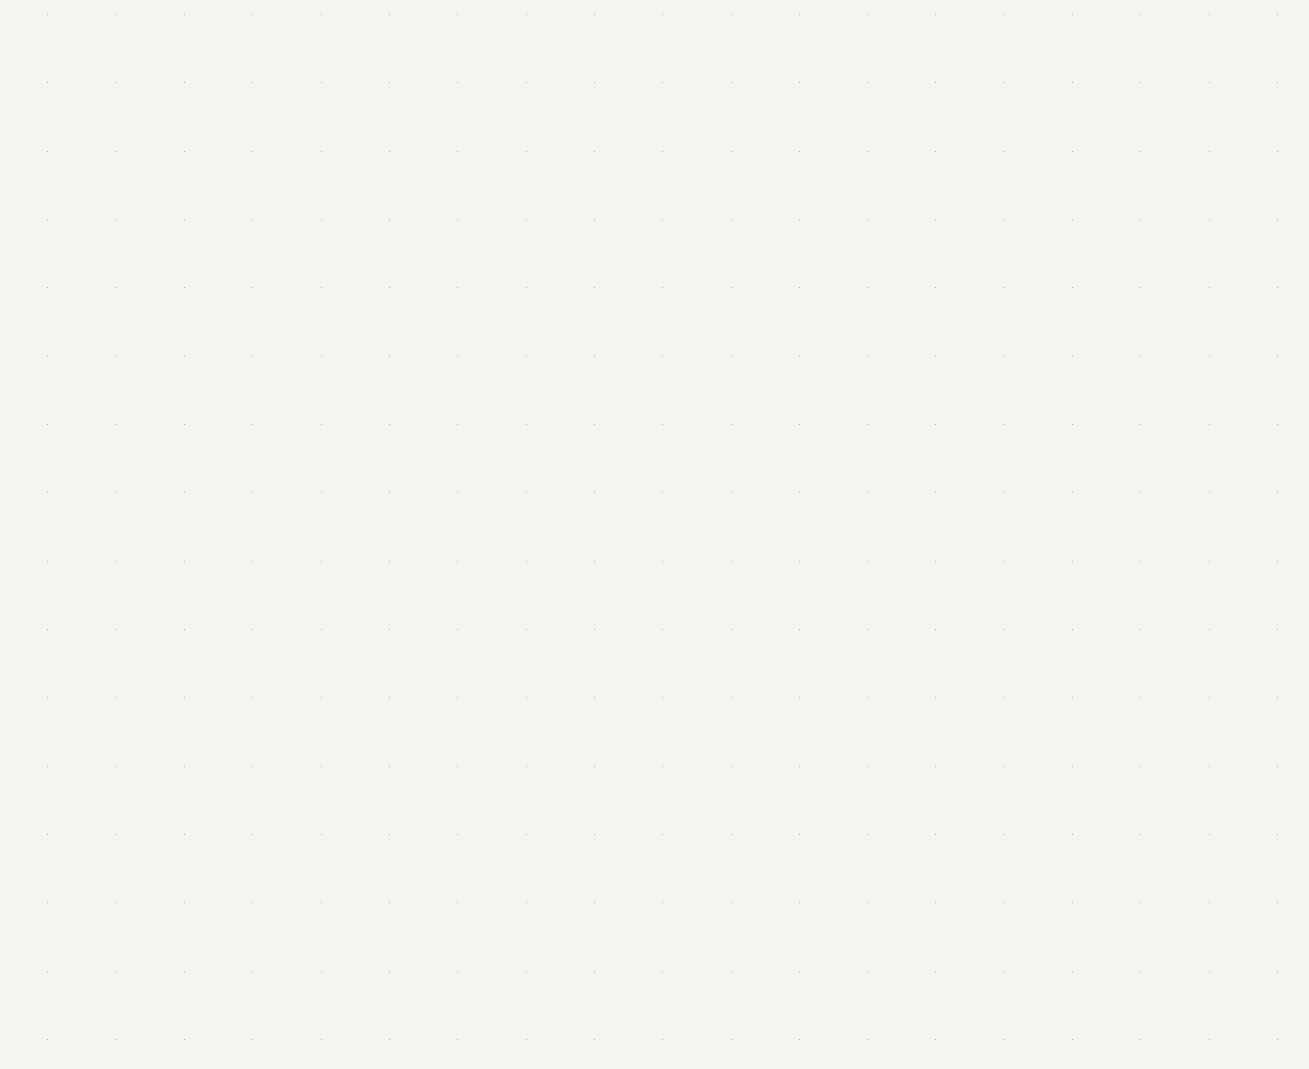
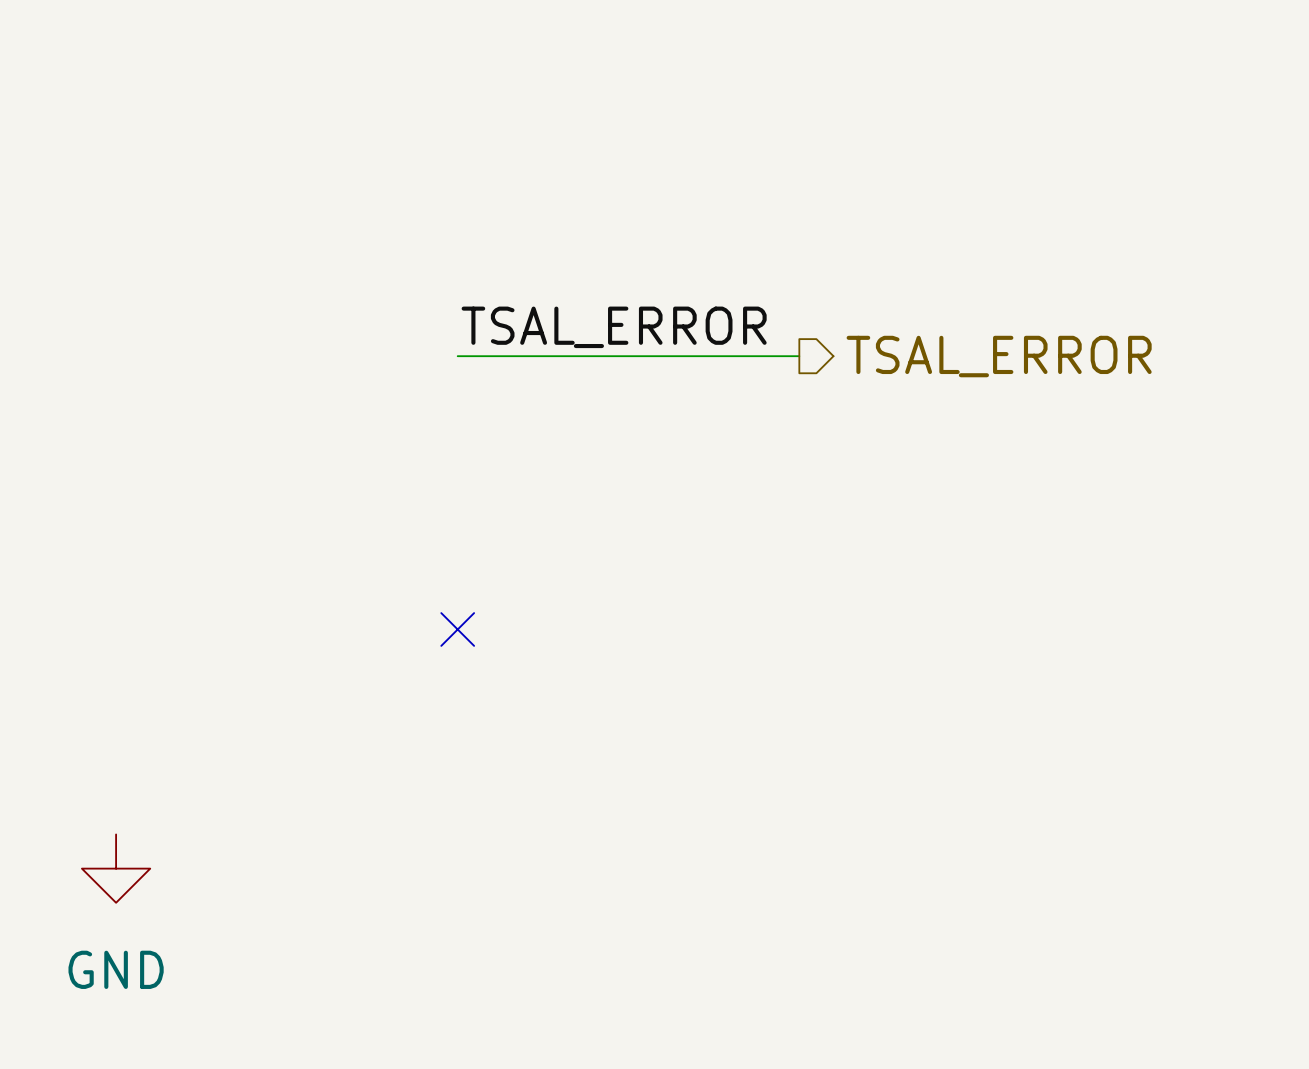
label: none -> TSAL_ERROR (614, 327)
wire: none -> (457, 356) (799, 356)
hierarchical label: none -> TSAL_ERROR (999, 356)
no-connect mark: none -> (457, 629)
power symbol: none -> GND (116, 868)

